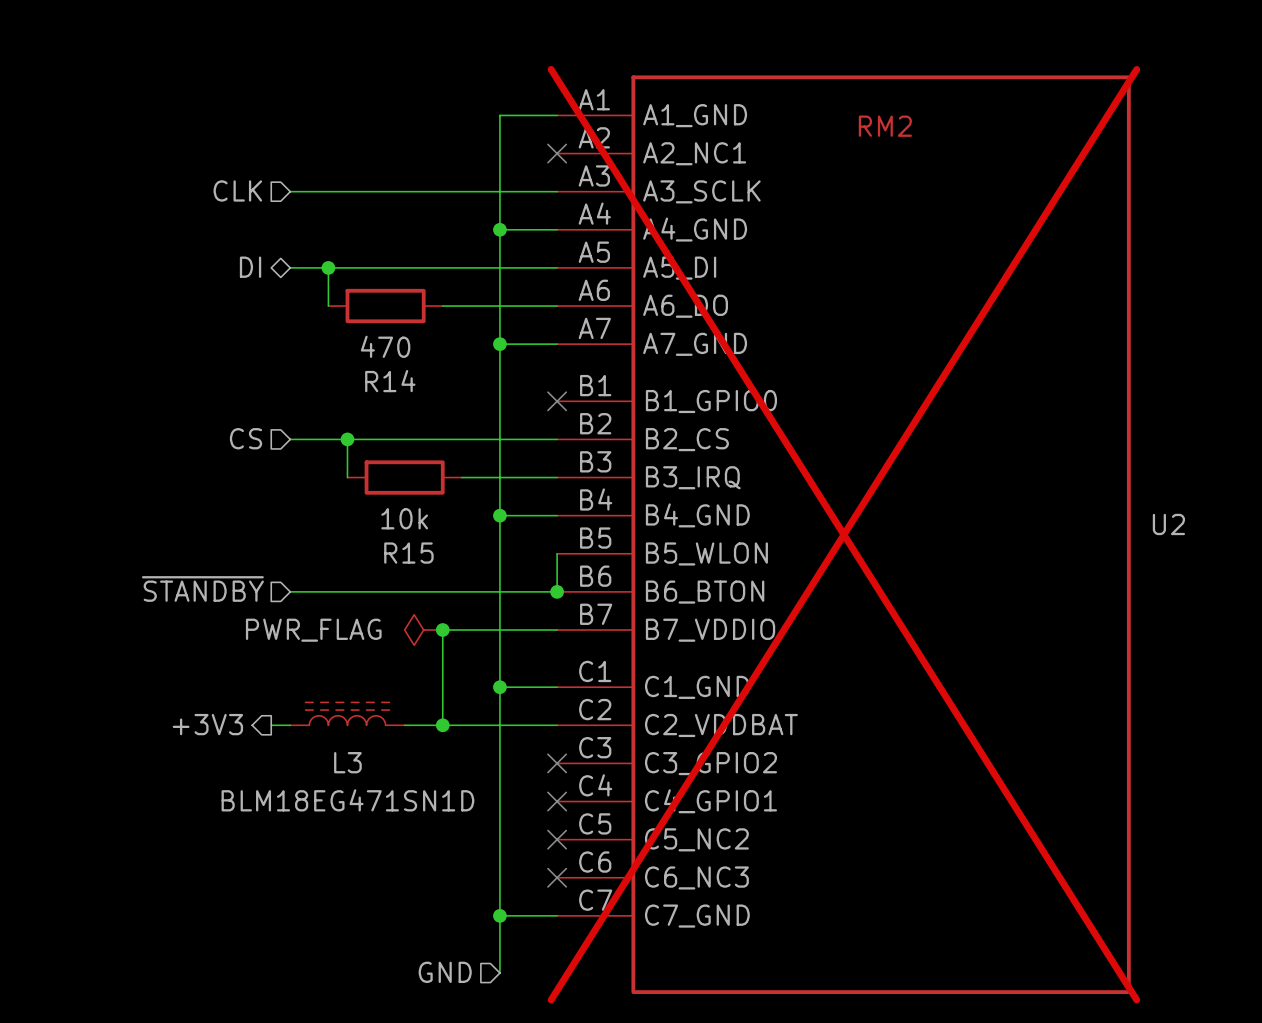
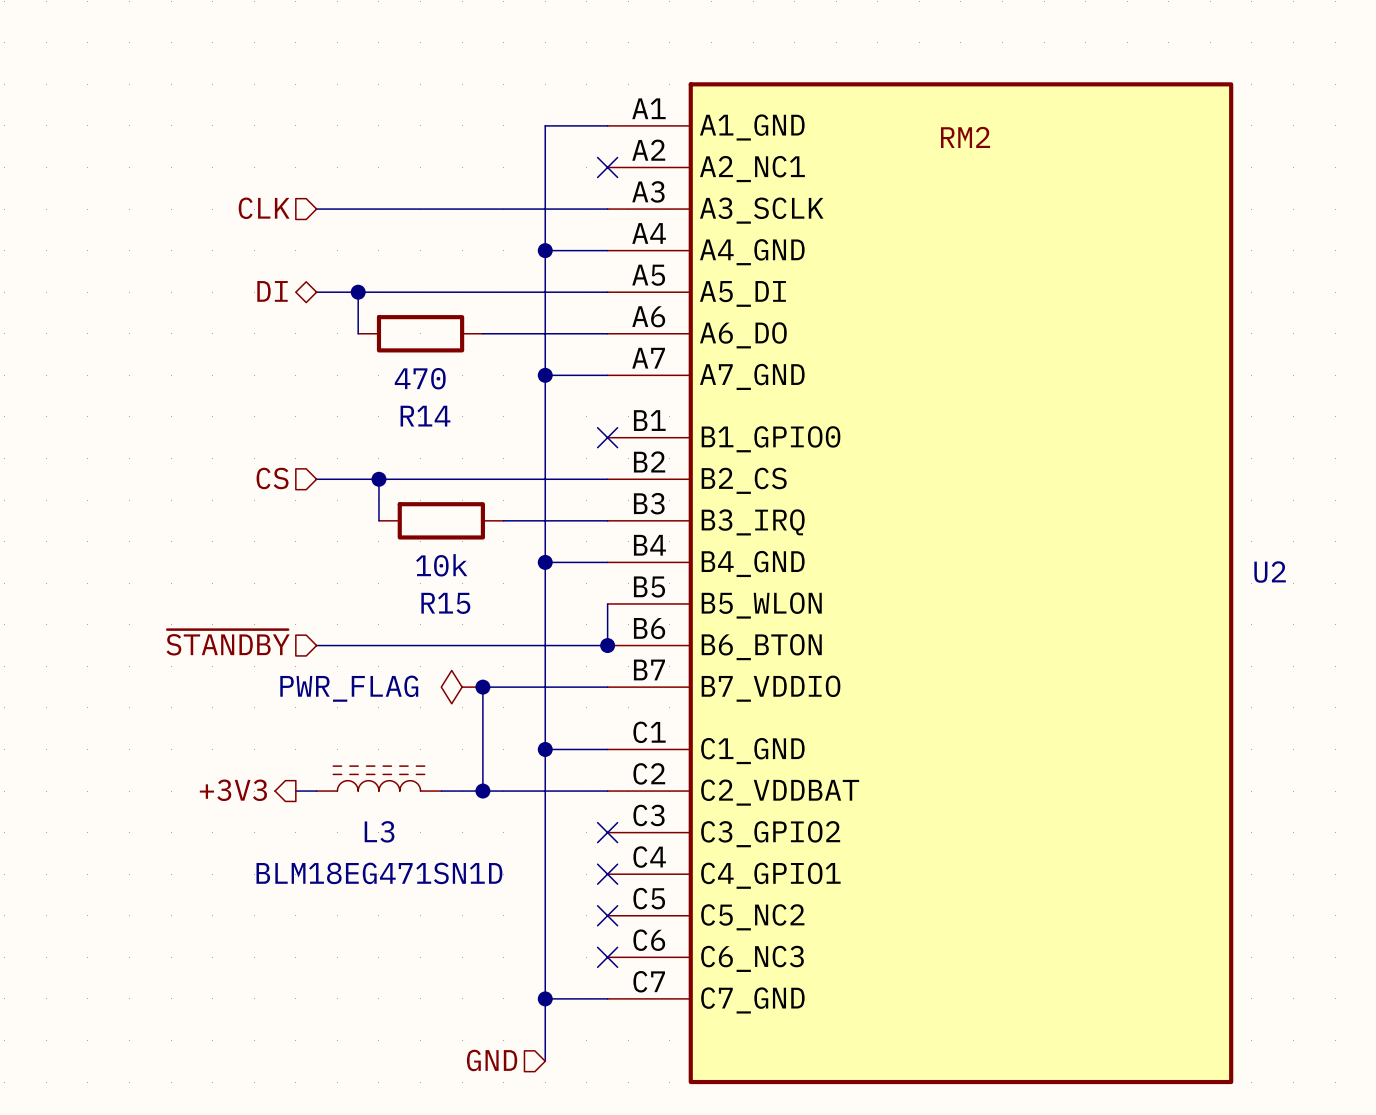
U2 do-not-place cross: (843, 534) -> none

